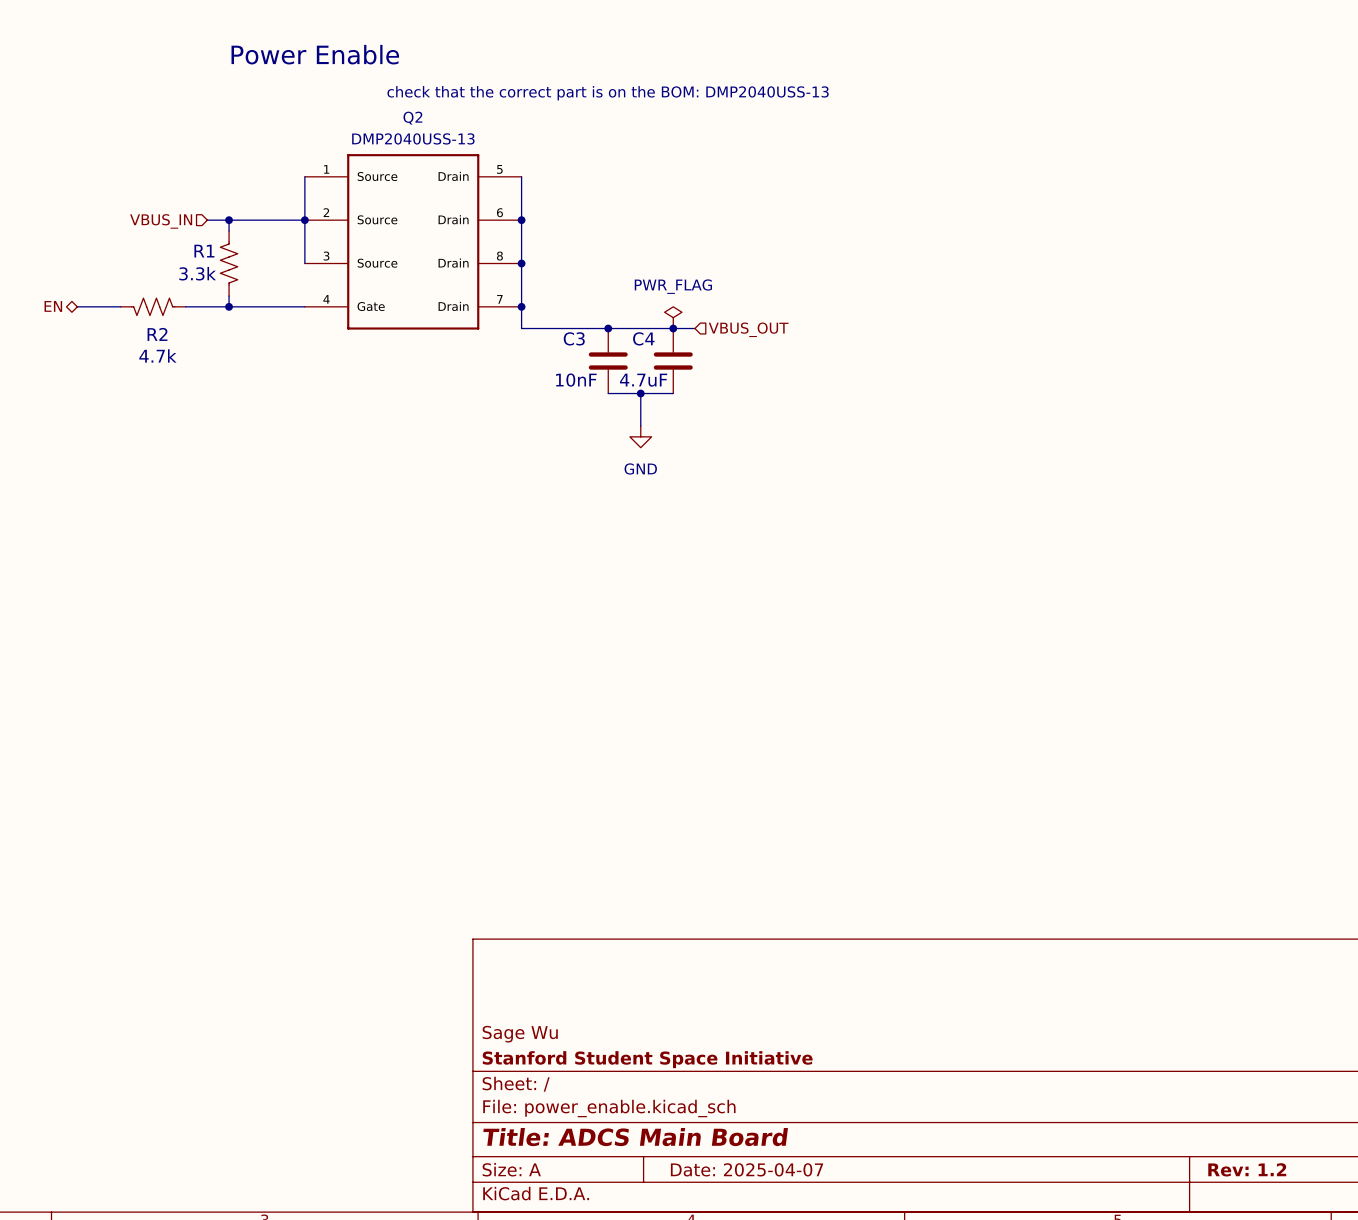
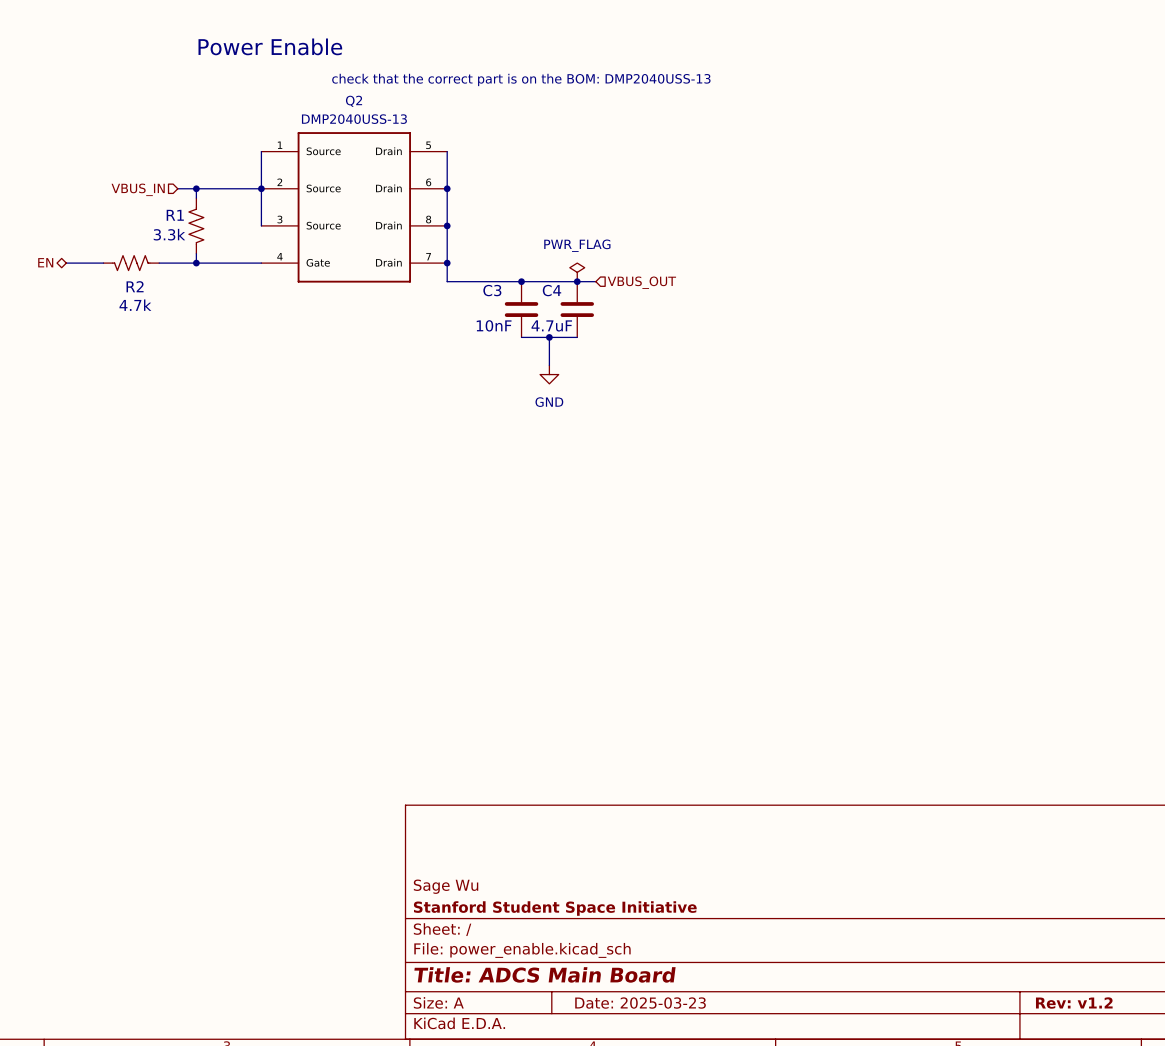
title block: Date: 2025-04-07 (747, 1169) -> Date: 2025-03-23 (640, 1003)
title block: Rev: 1.2 (1247, 1169) -> Rev: v1.2 (1074, 1003)

